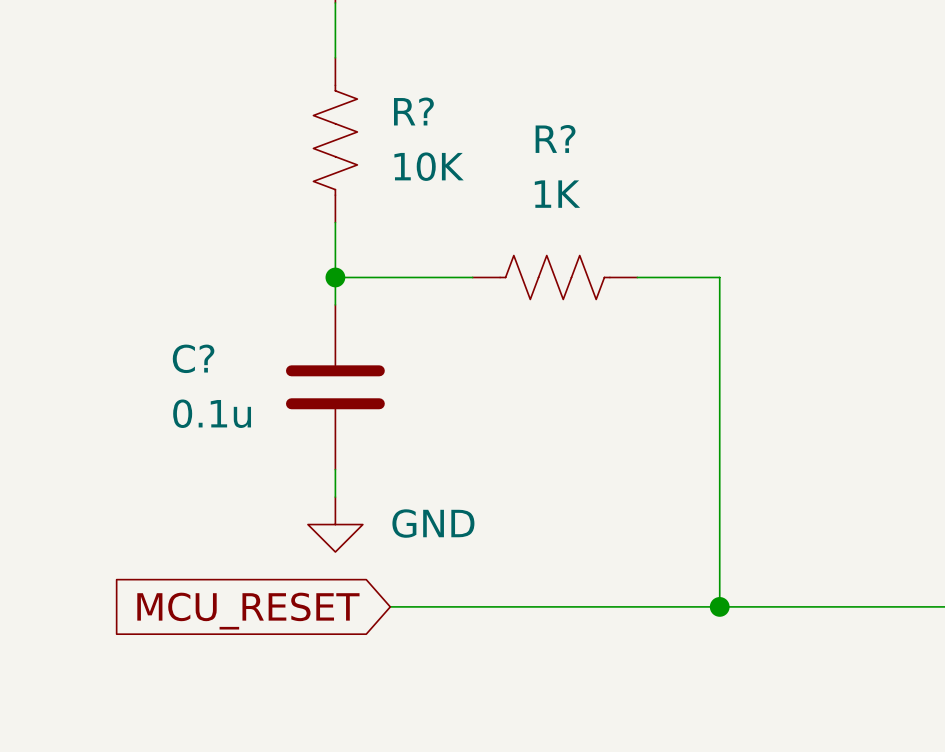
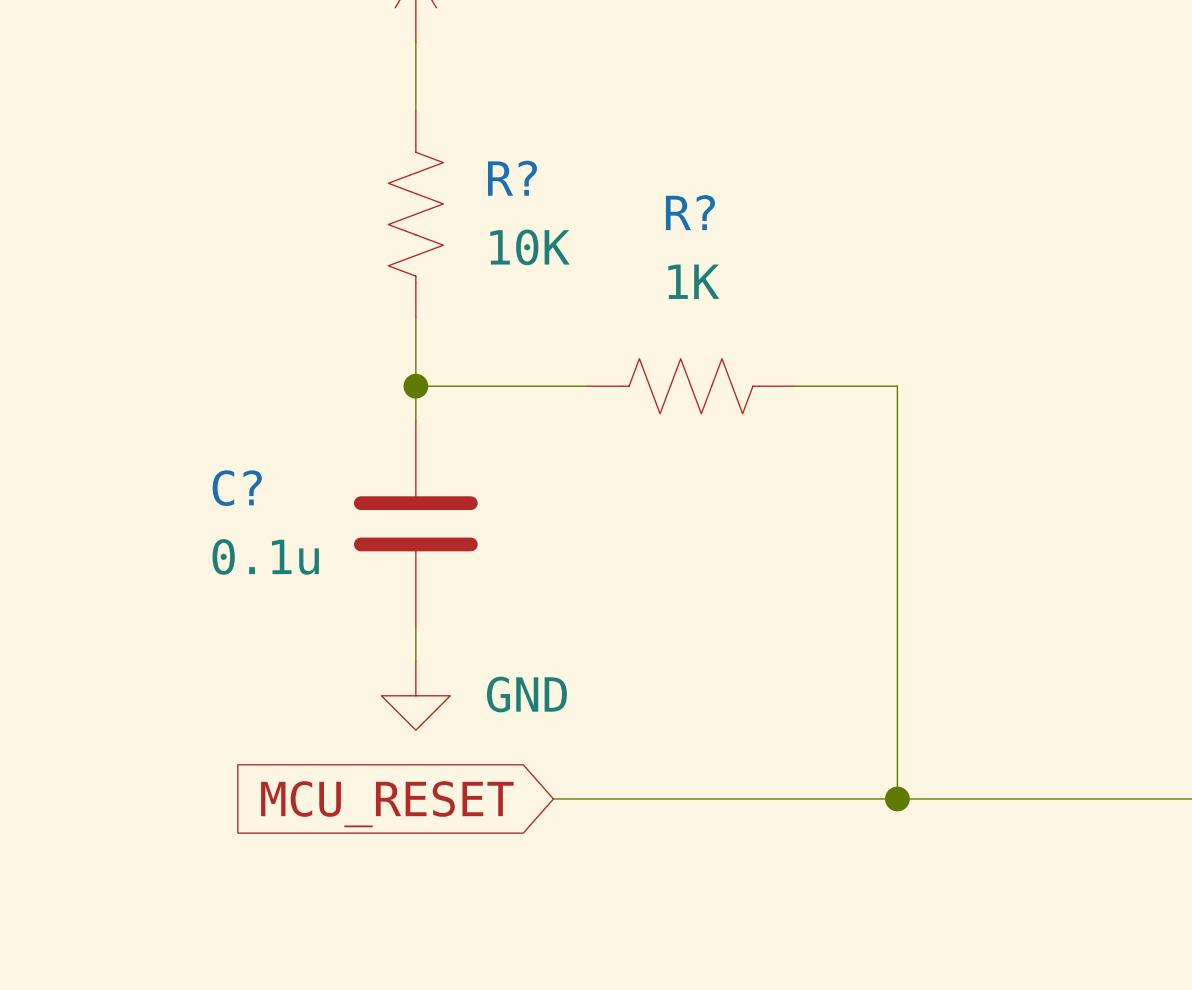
wire: (390, 606) (445, 606) -> none
global label position: MCU_RESET (248, 611) -> MCU_RESET (387, 804)

